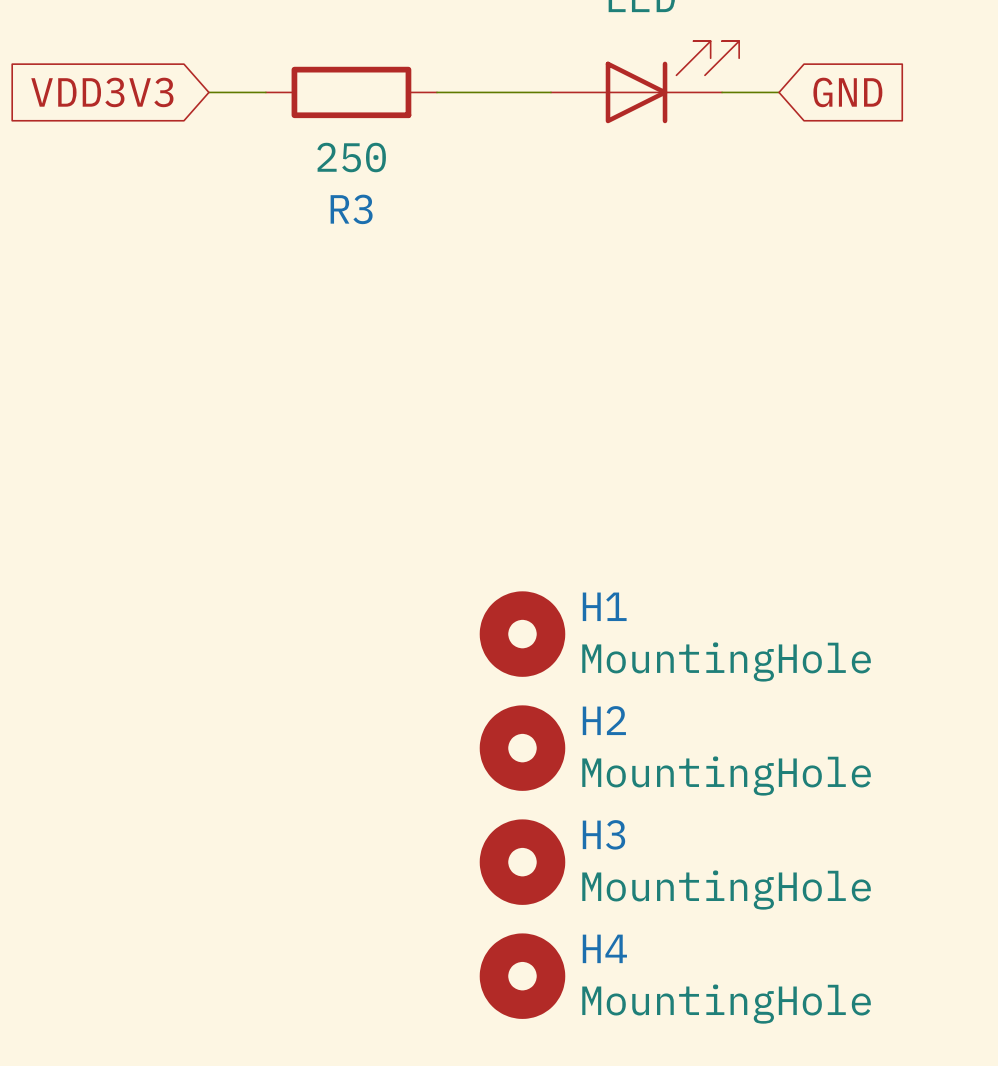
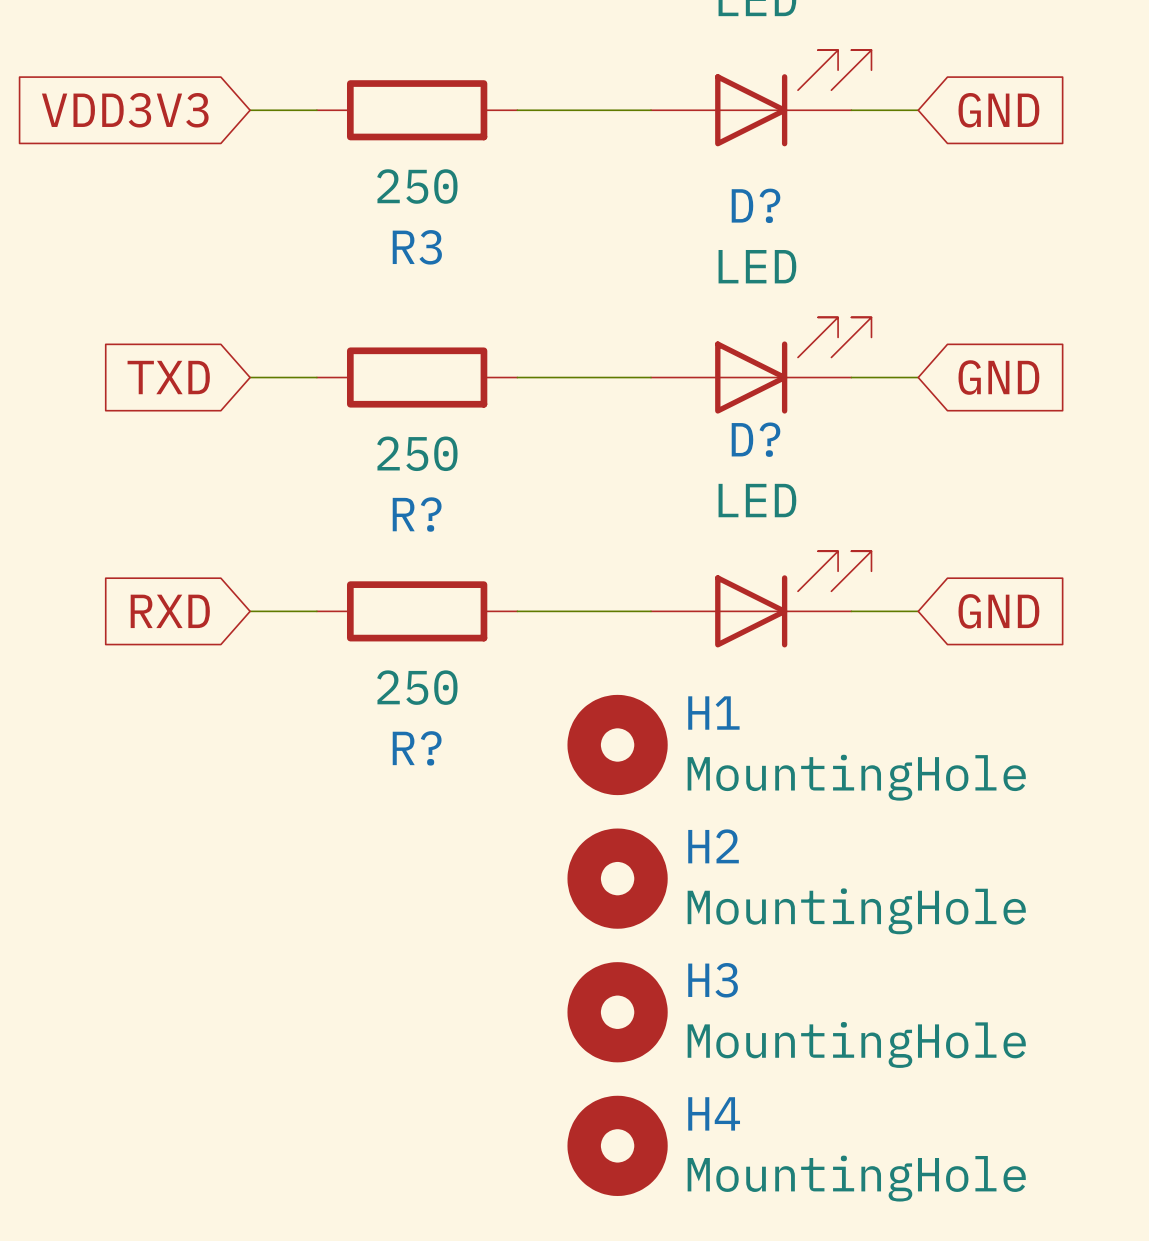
D?: none -> LED (761, 365)
global label: none -> TXD (168, 377)
wire: none -> (250, 377) (316, 377)
R?: none -> 250 (417, 377)
wire: none -> (517, 377) (650, 377)
wire: none -> (851, 377) (918, 377)
global label: none -> GND (998, 377)
D?: none -> LED (761, 599)
global label: none -> RXD (170, 611)
wire: none -> (250, 611) (316, 611)
R?: none -> 250 (417, 611)
wire: none -> (517, 611) (650, 611)
wire: none -> (851, 611) (918, 611)
global label: none -> GND (998, 611)

